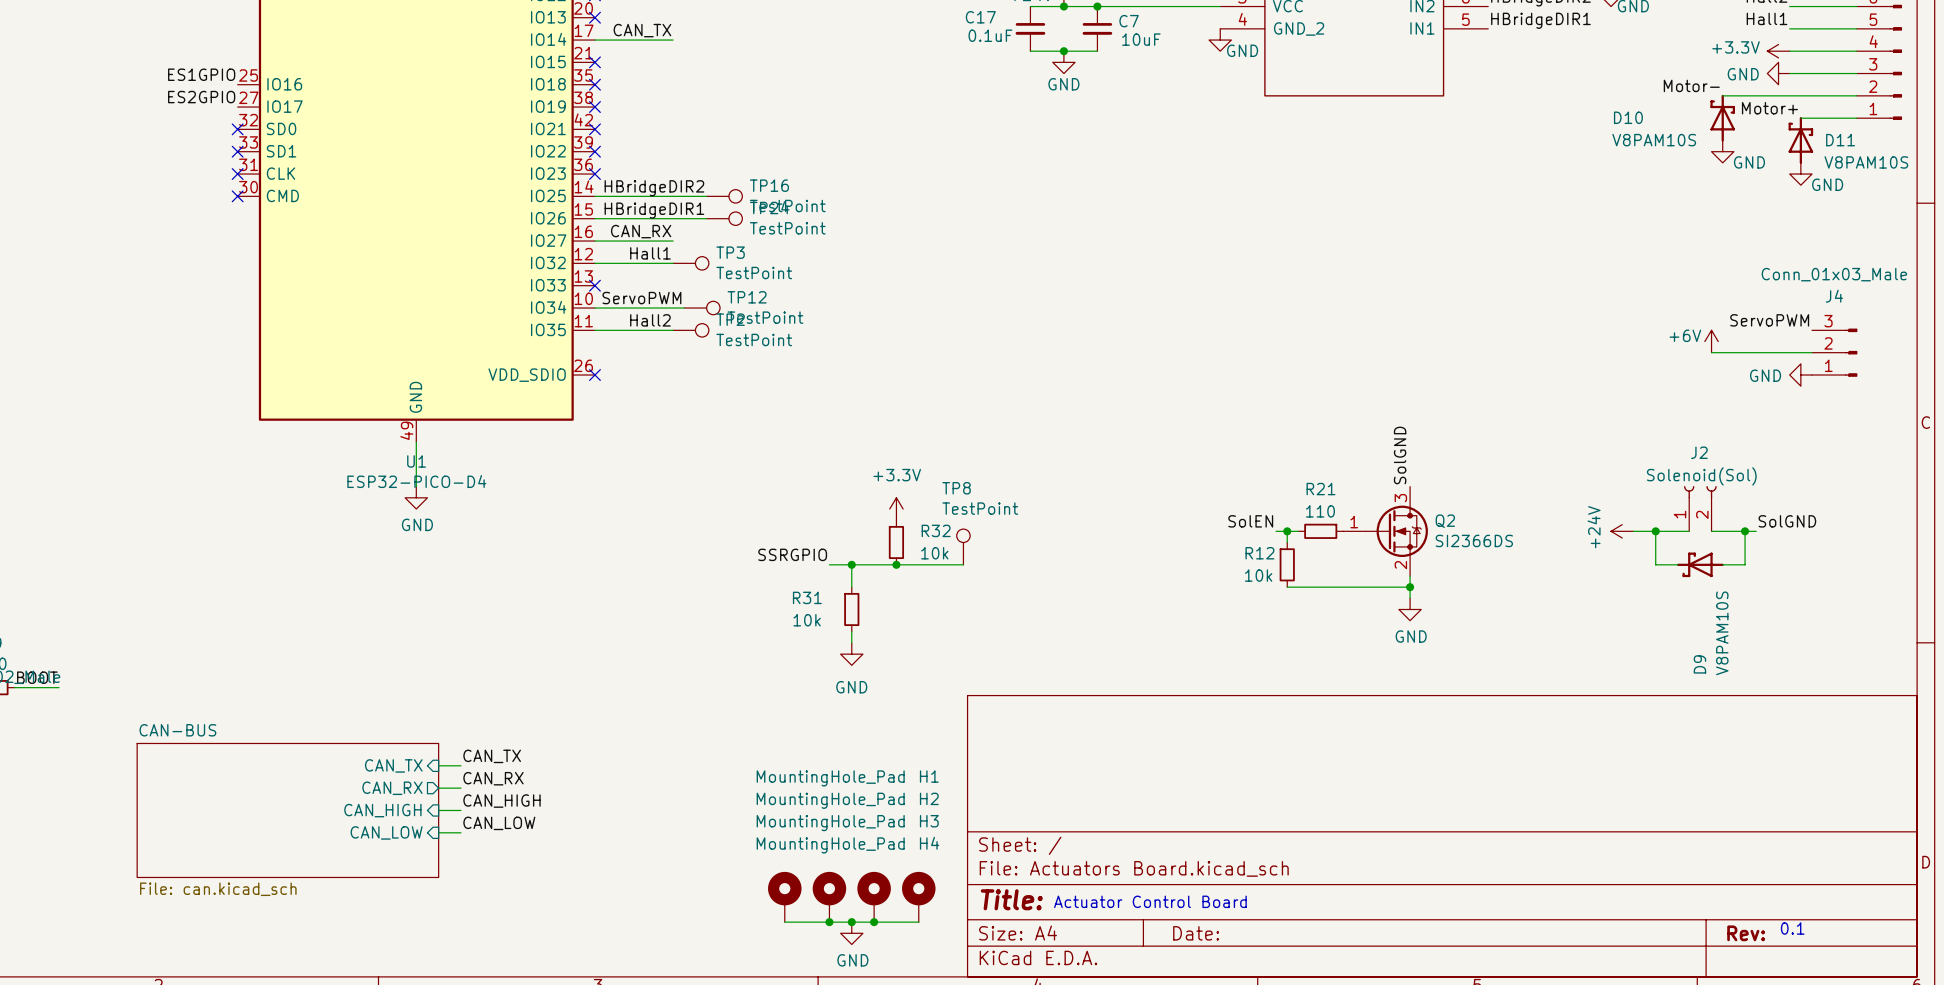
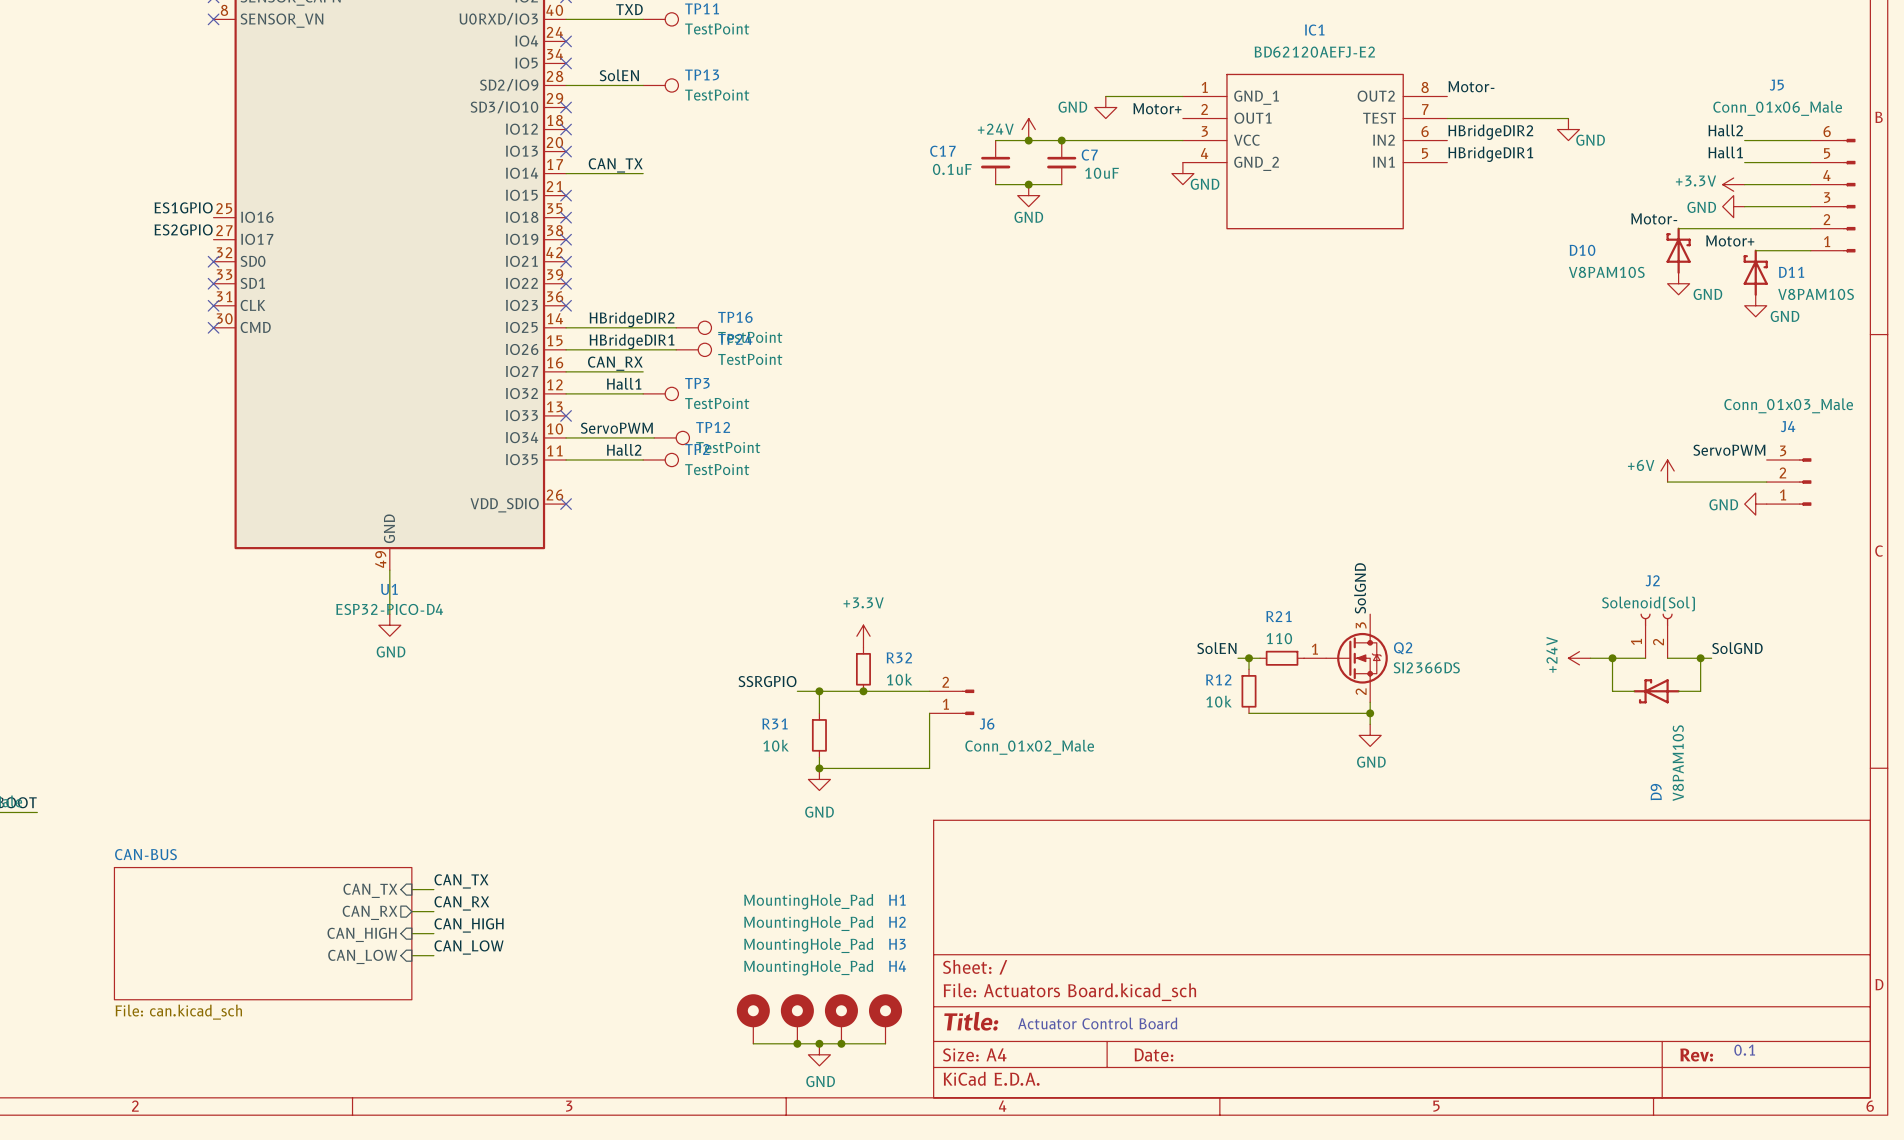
TP8: TestPoint (963, 546) -> none
J6: none -> Conn_01x02_Male (951, 702)
wire: none -> (929, 713) (929, 768) (819, 768)
junction: none -> (819, 768)

